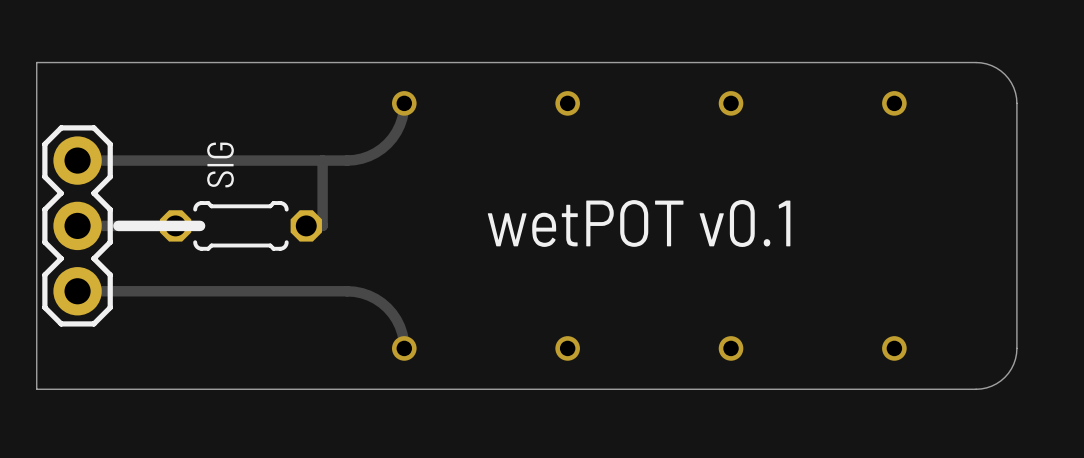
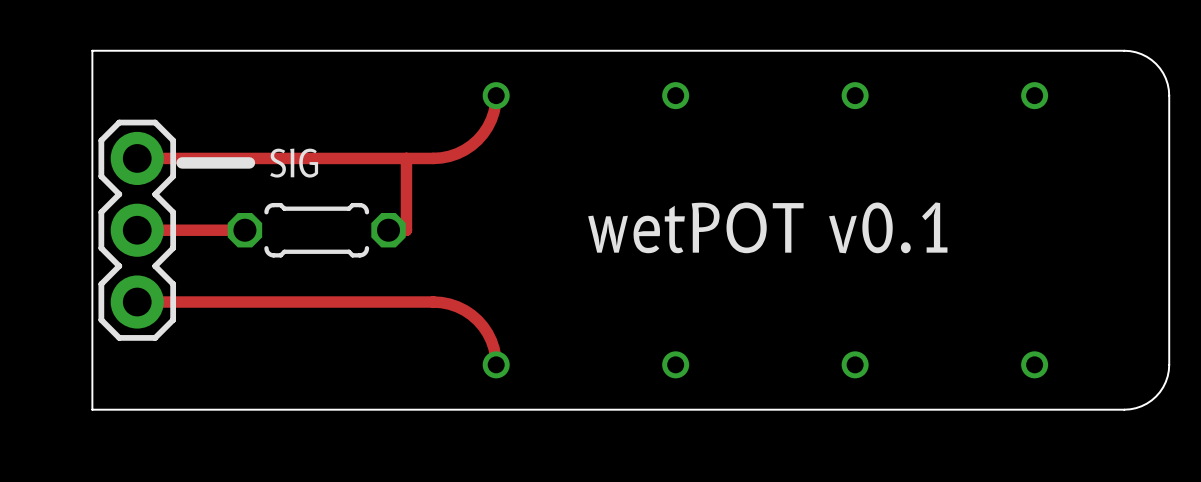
line: none -> (182, 162) (249, 162)
text rotation: 0° (220, 164) -> 90° clockwise (294, 163)
line: (118, 225) (200, 225) -> none

